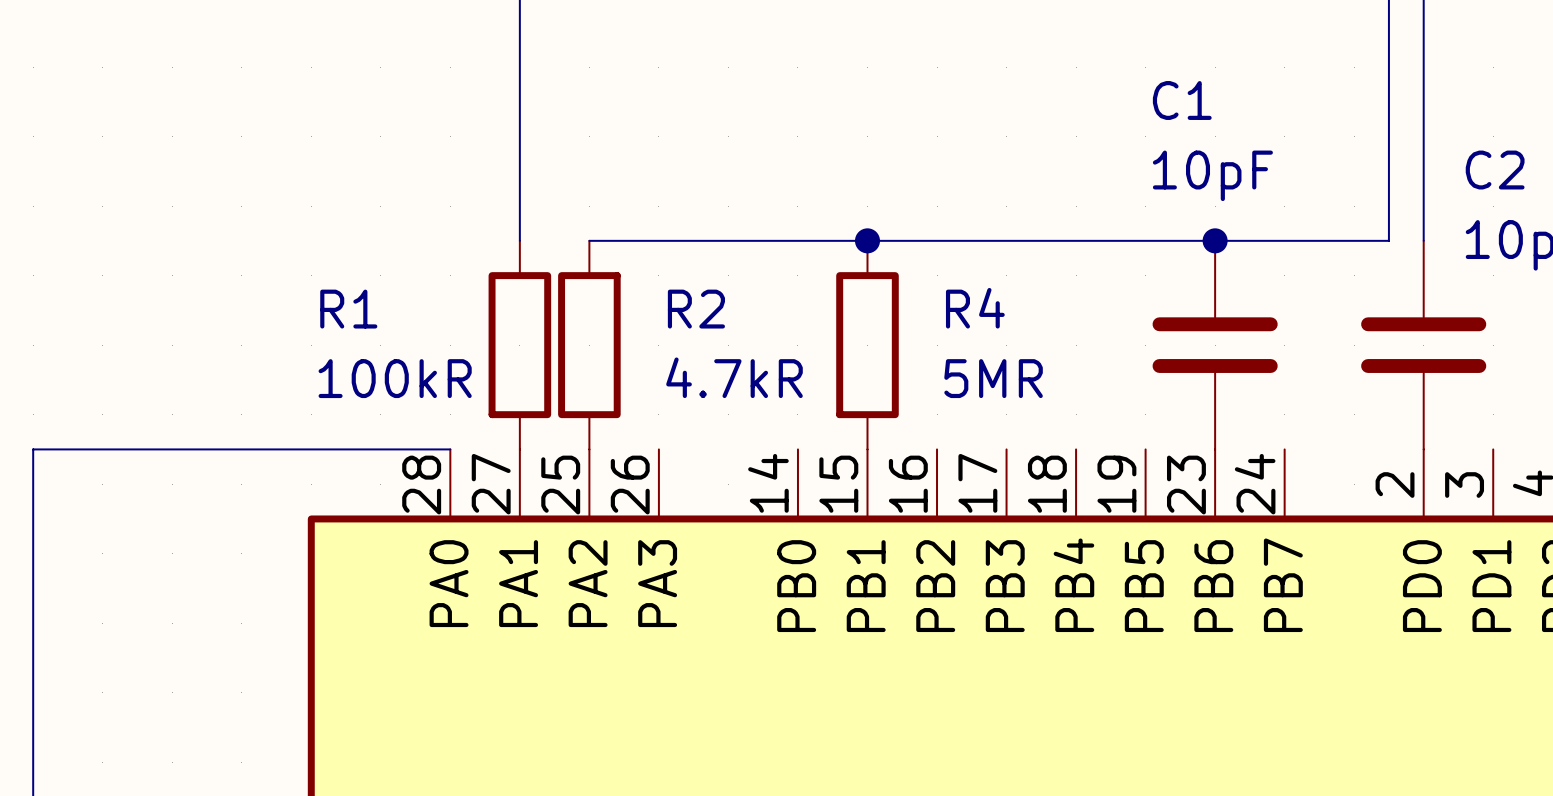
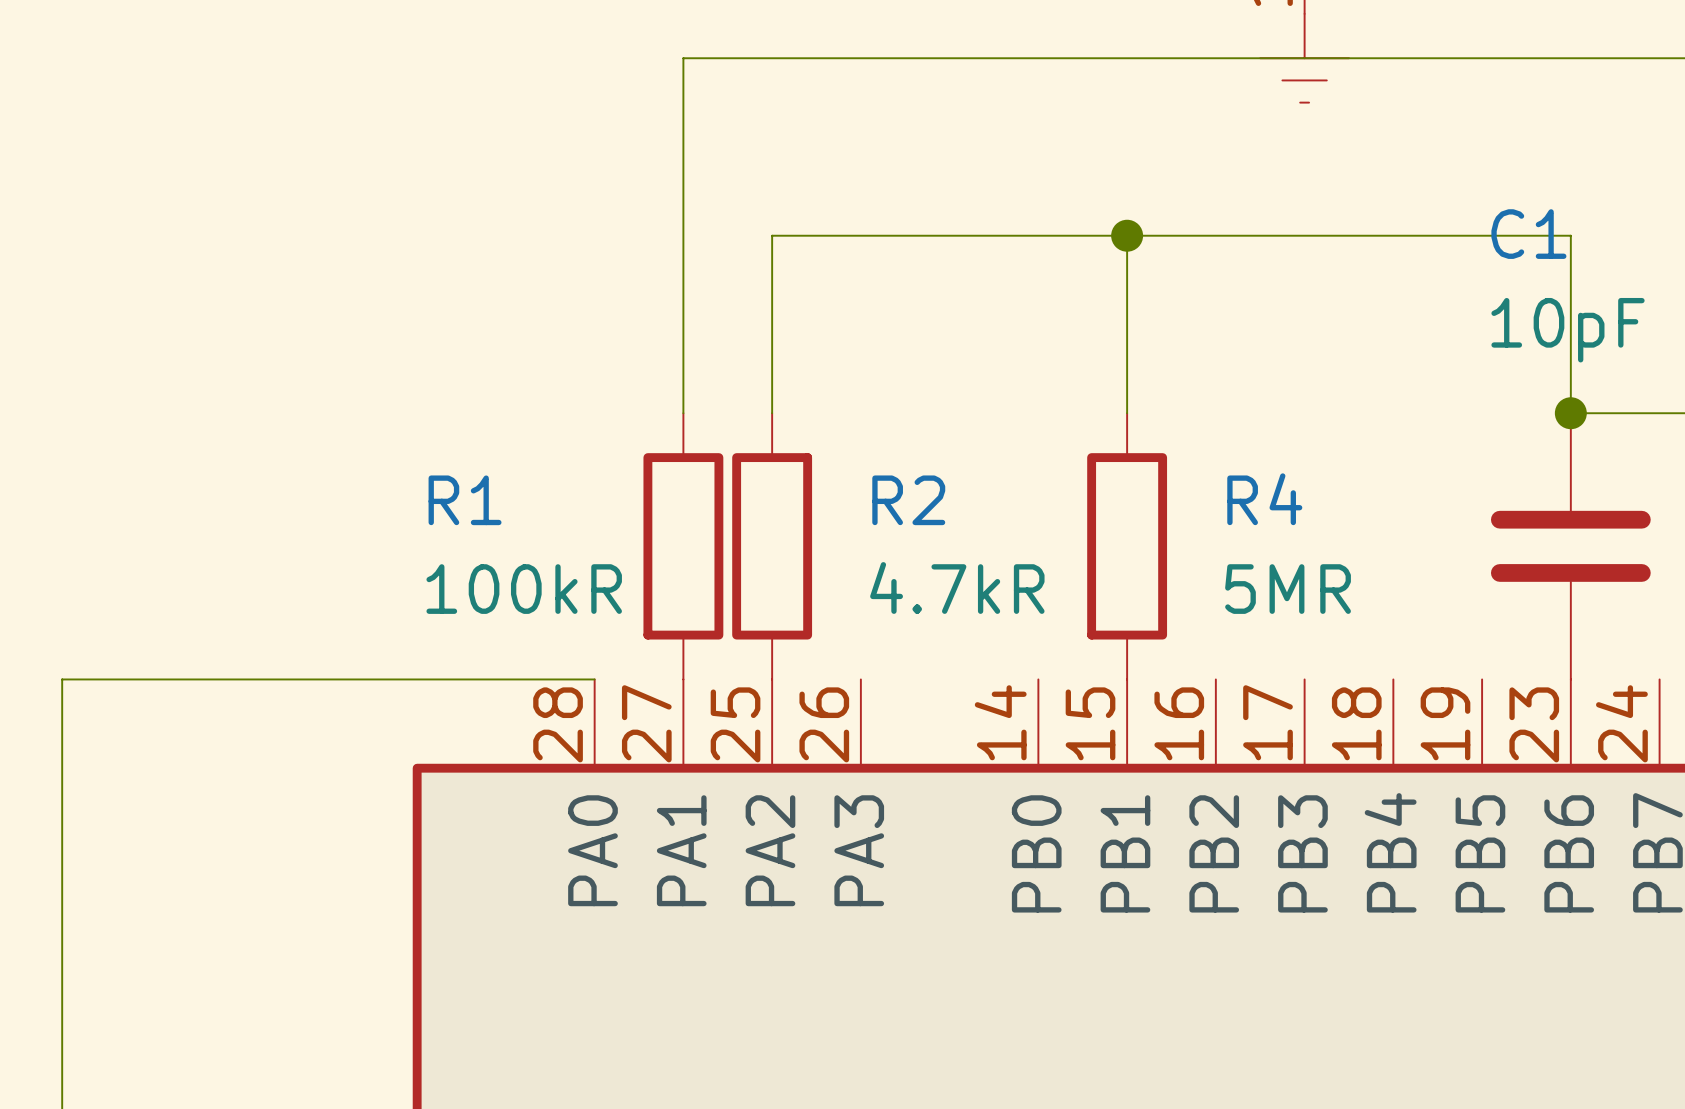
wire: none -> (1127, 235) (1127, 413)
wire: (589, 240) (1215, 240) -> (772, 413) (772, 235) (1570, 235) (1570, 413)
junction position: (867, 240) -> (1127, 235)

